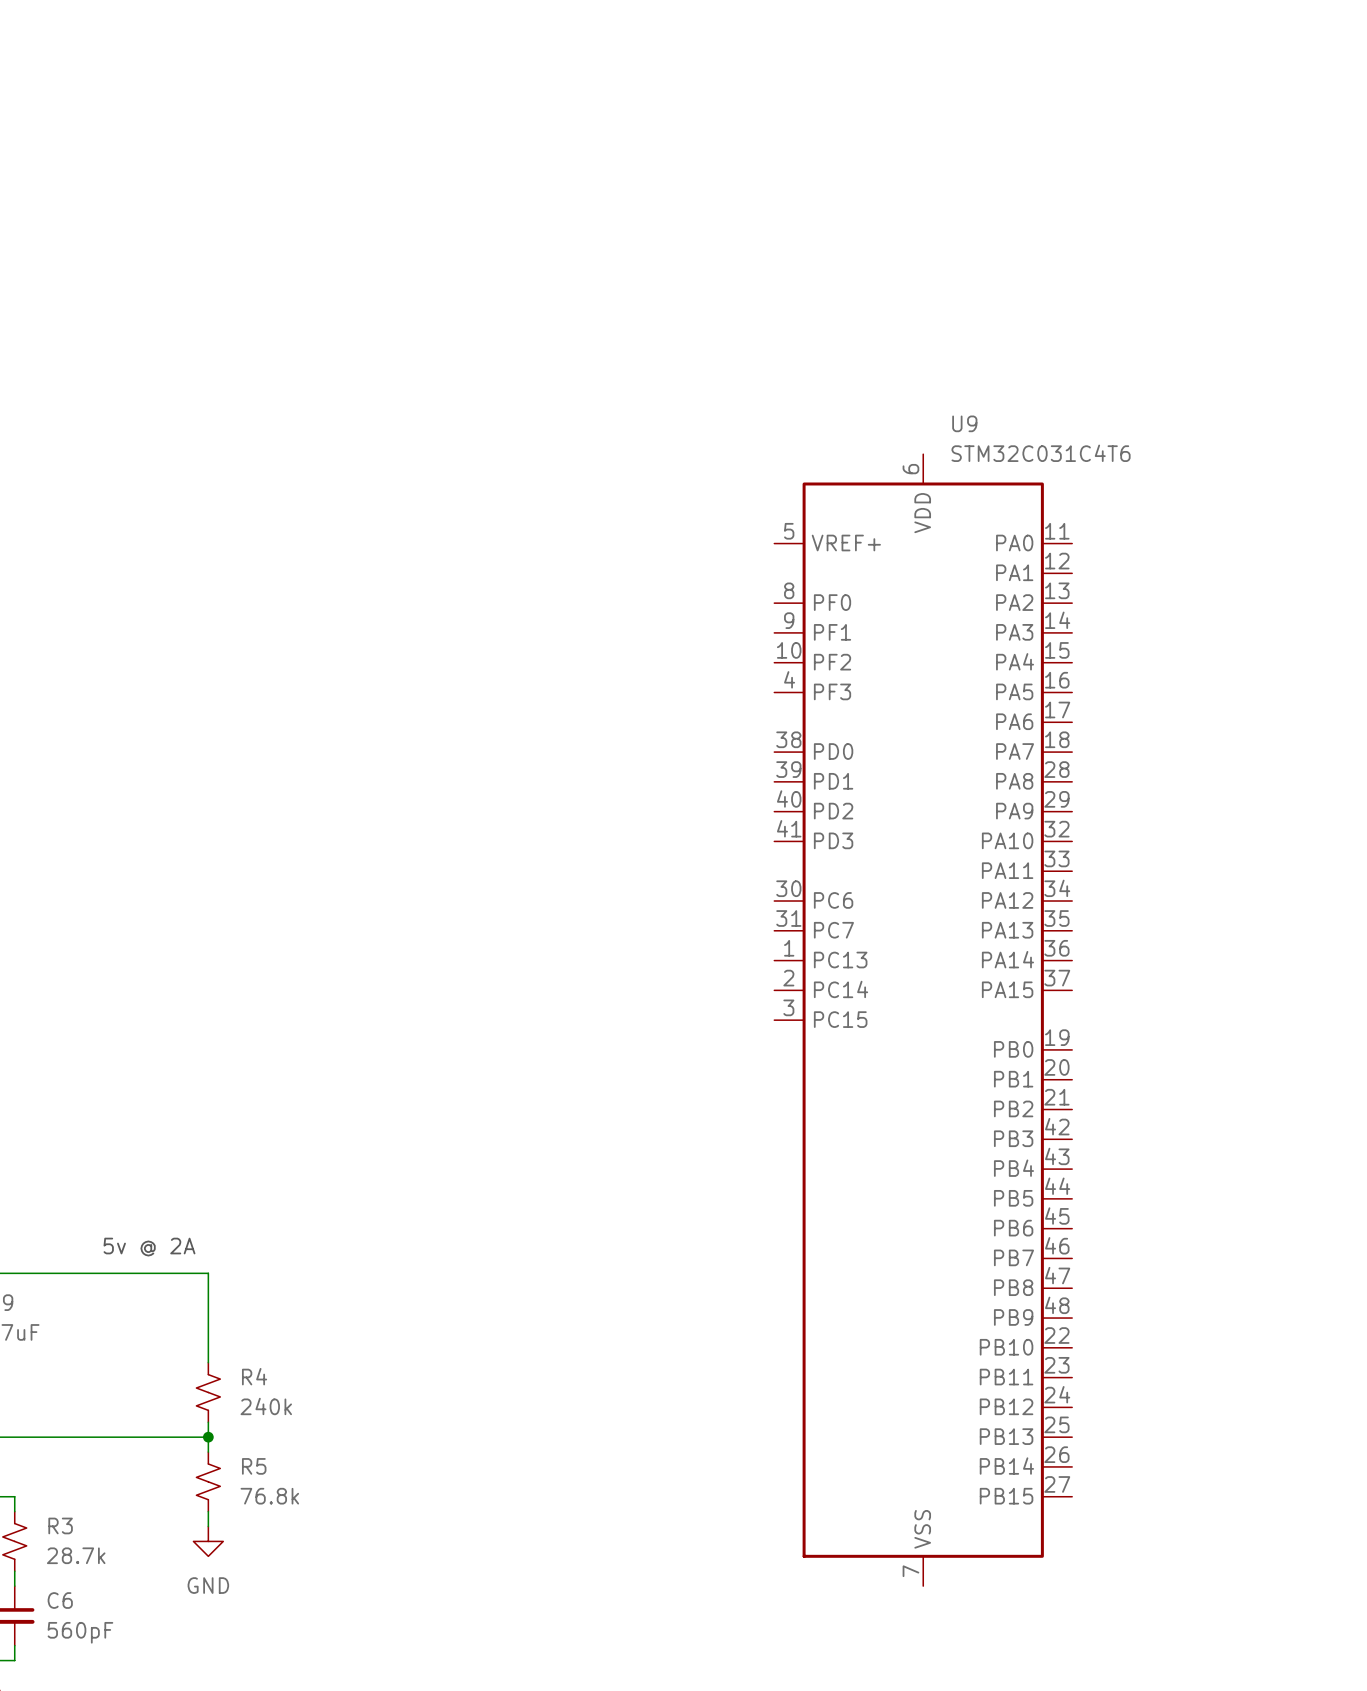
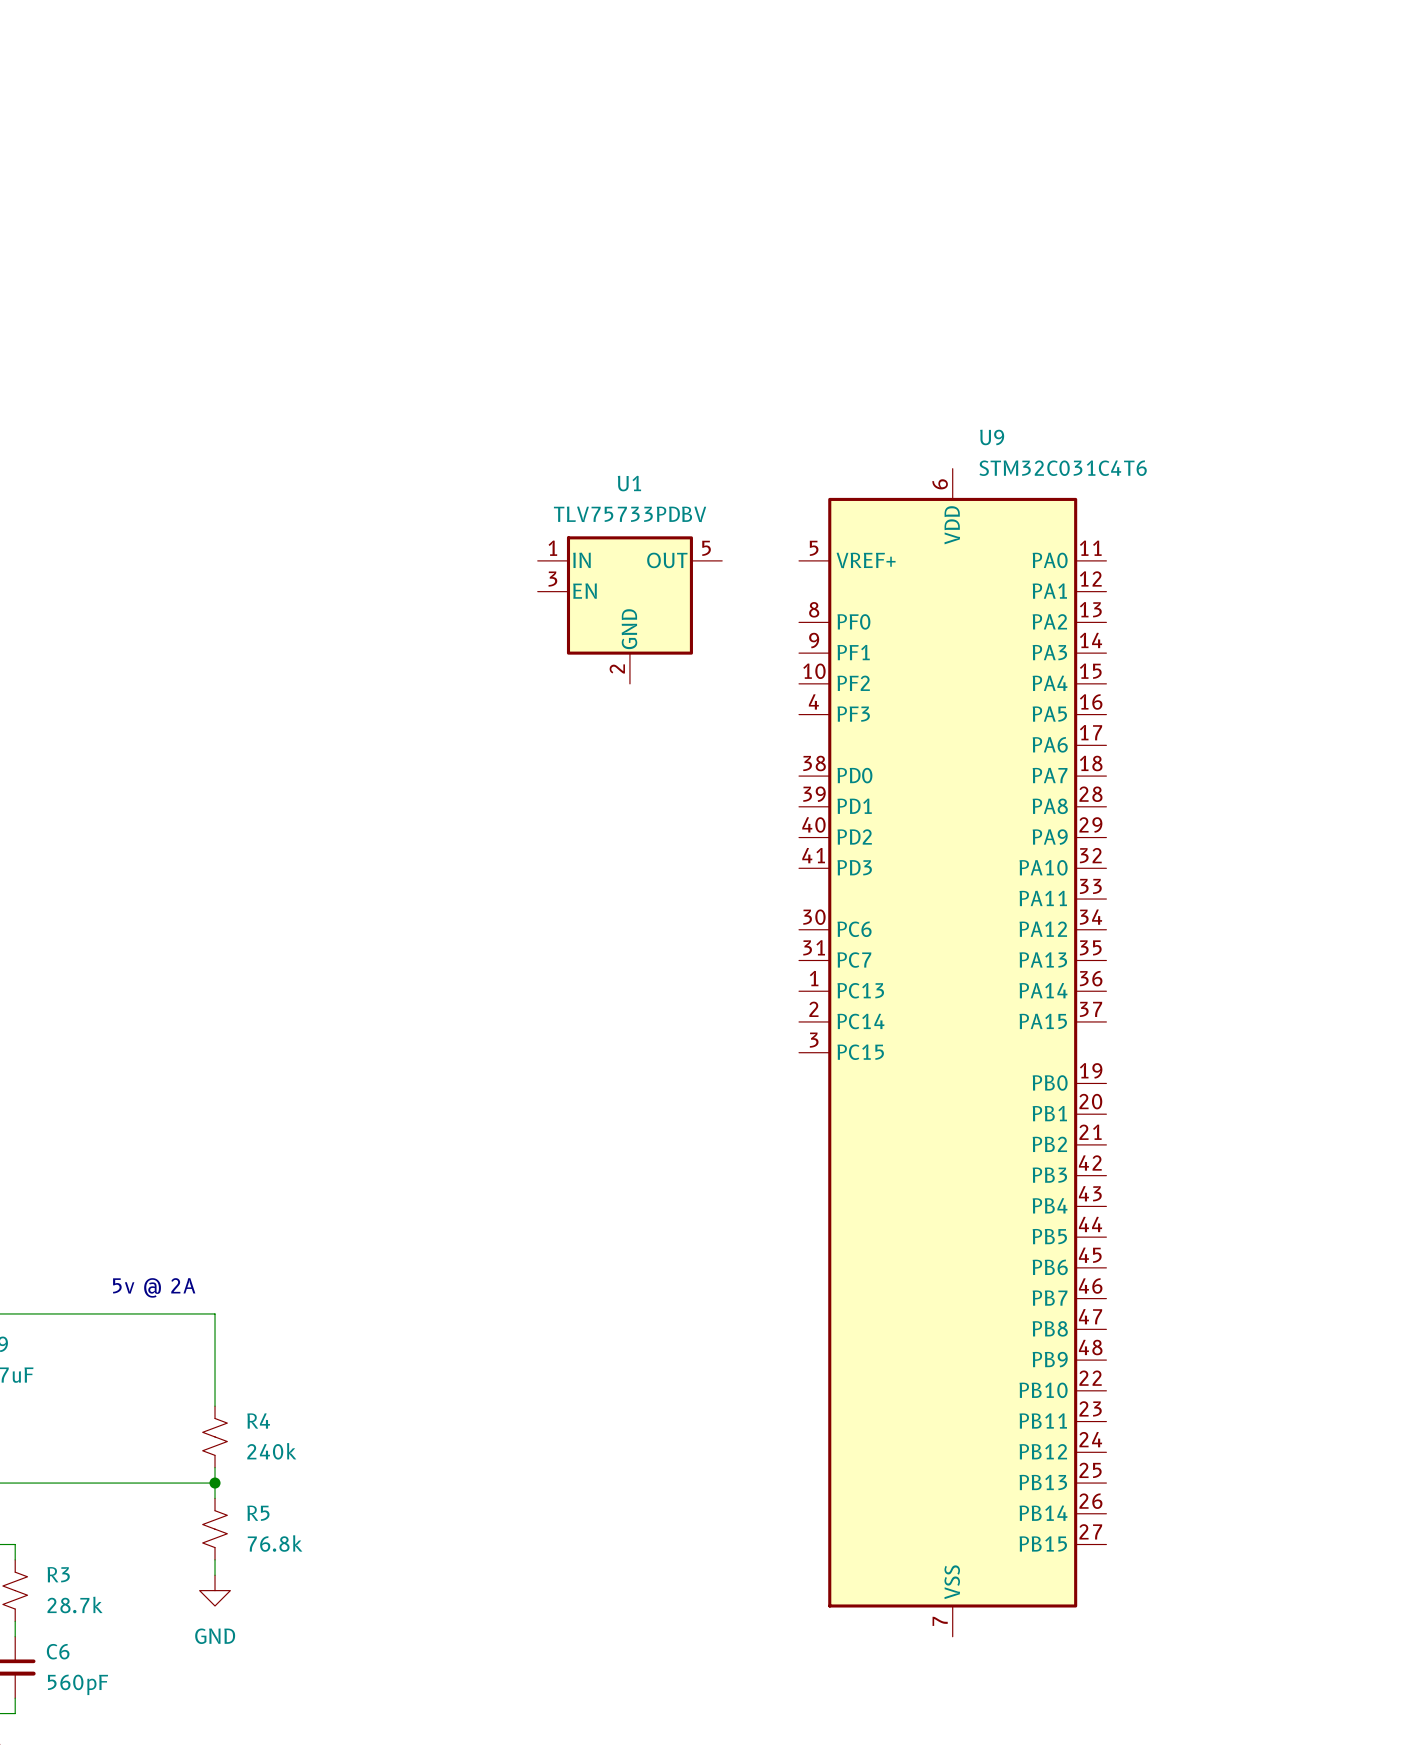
U1: none -> TLV75733PDBV (629, 610)

